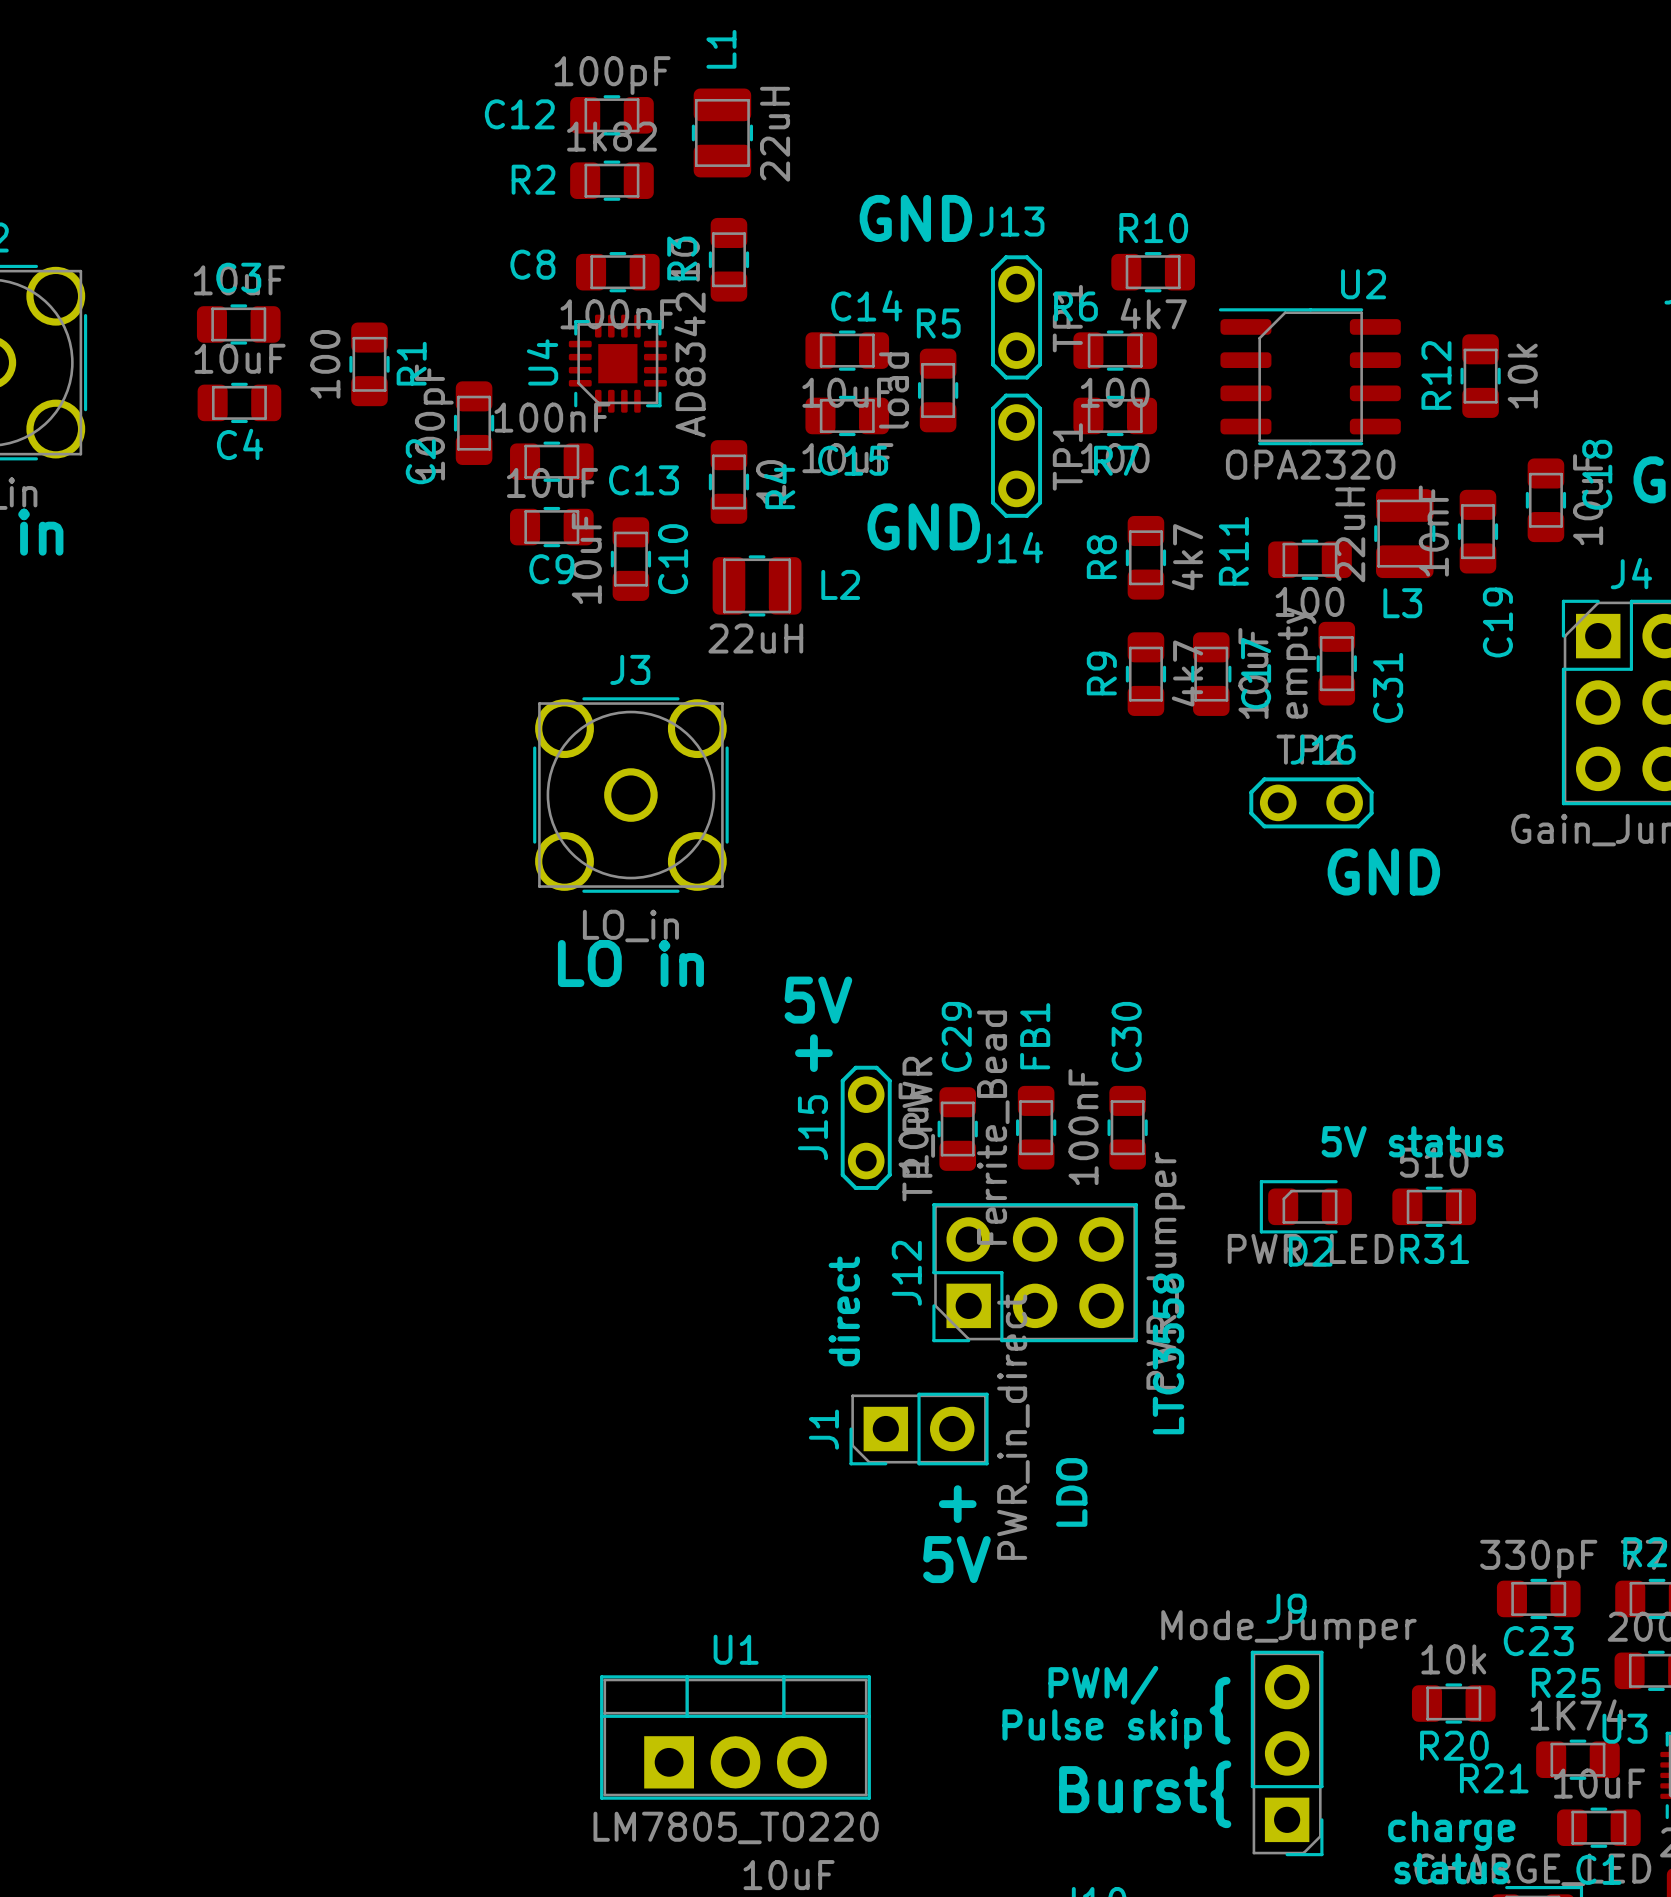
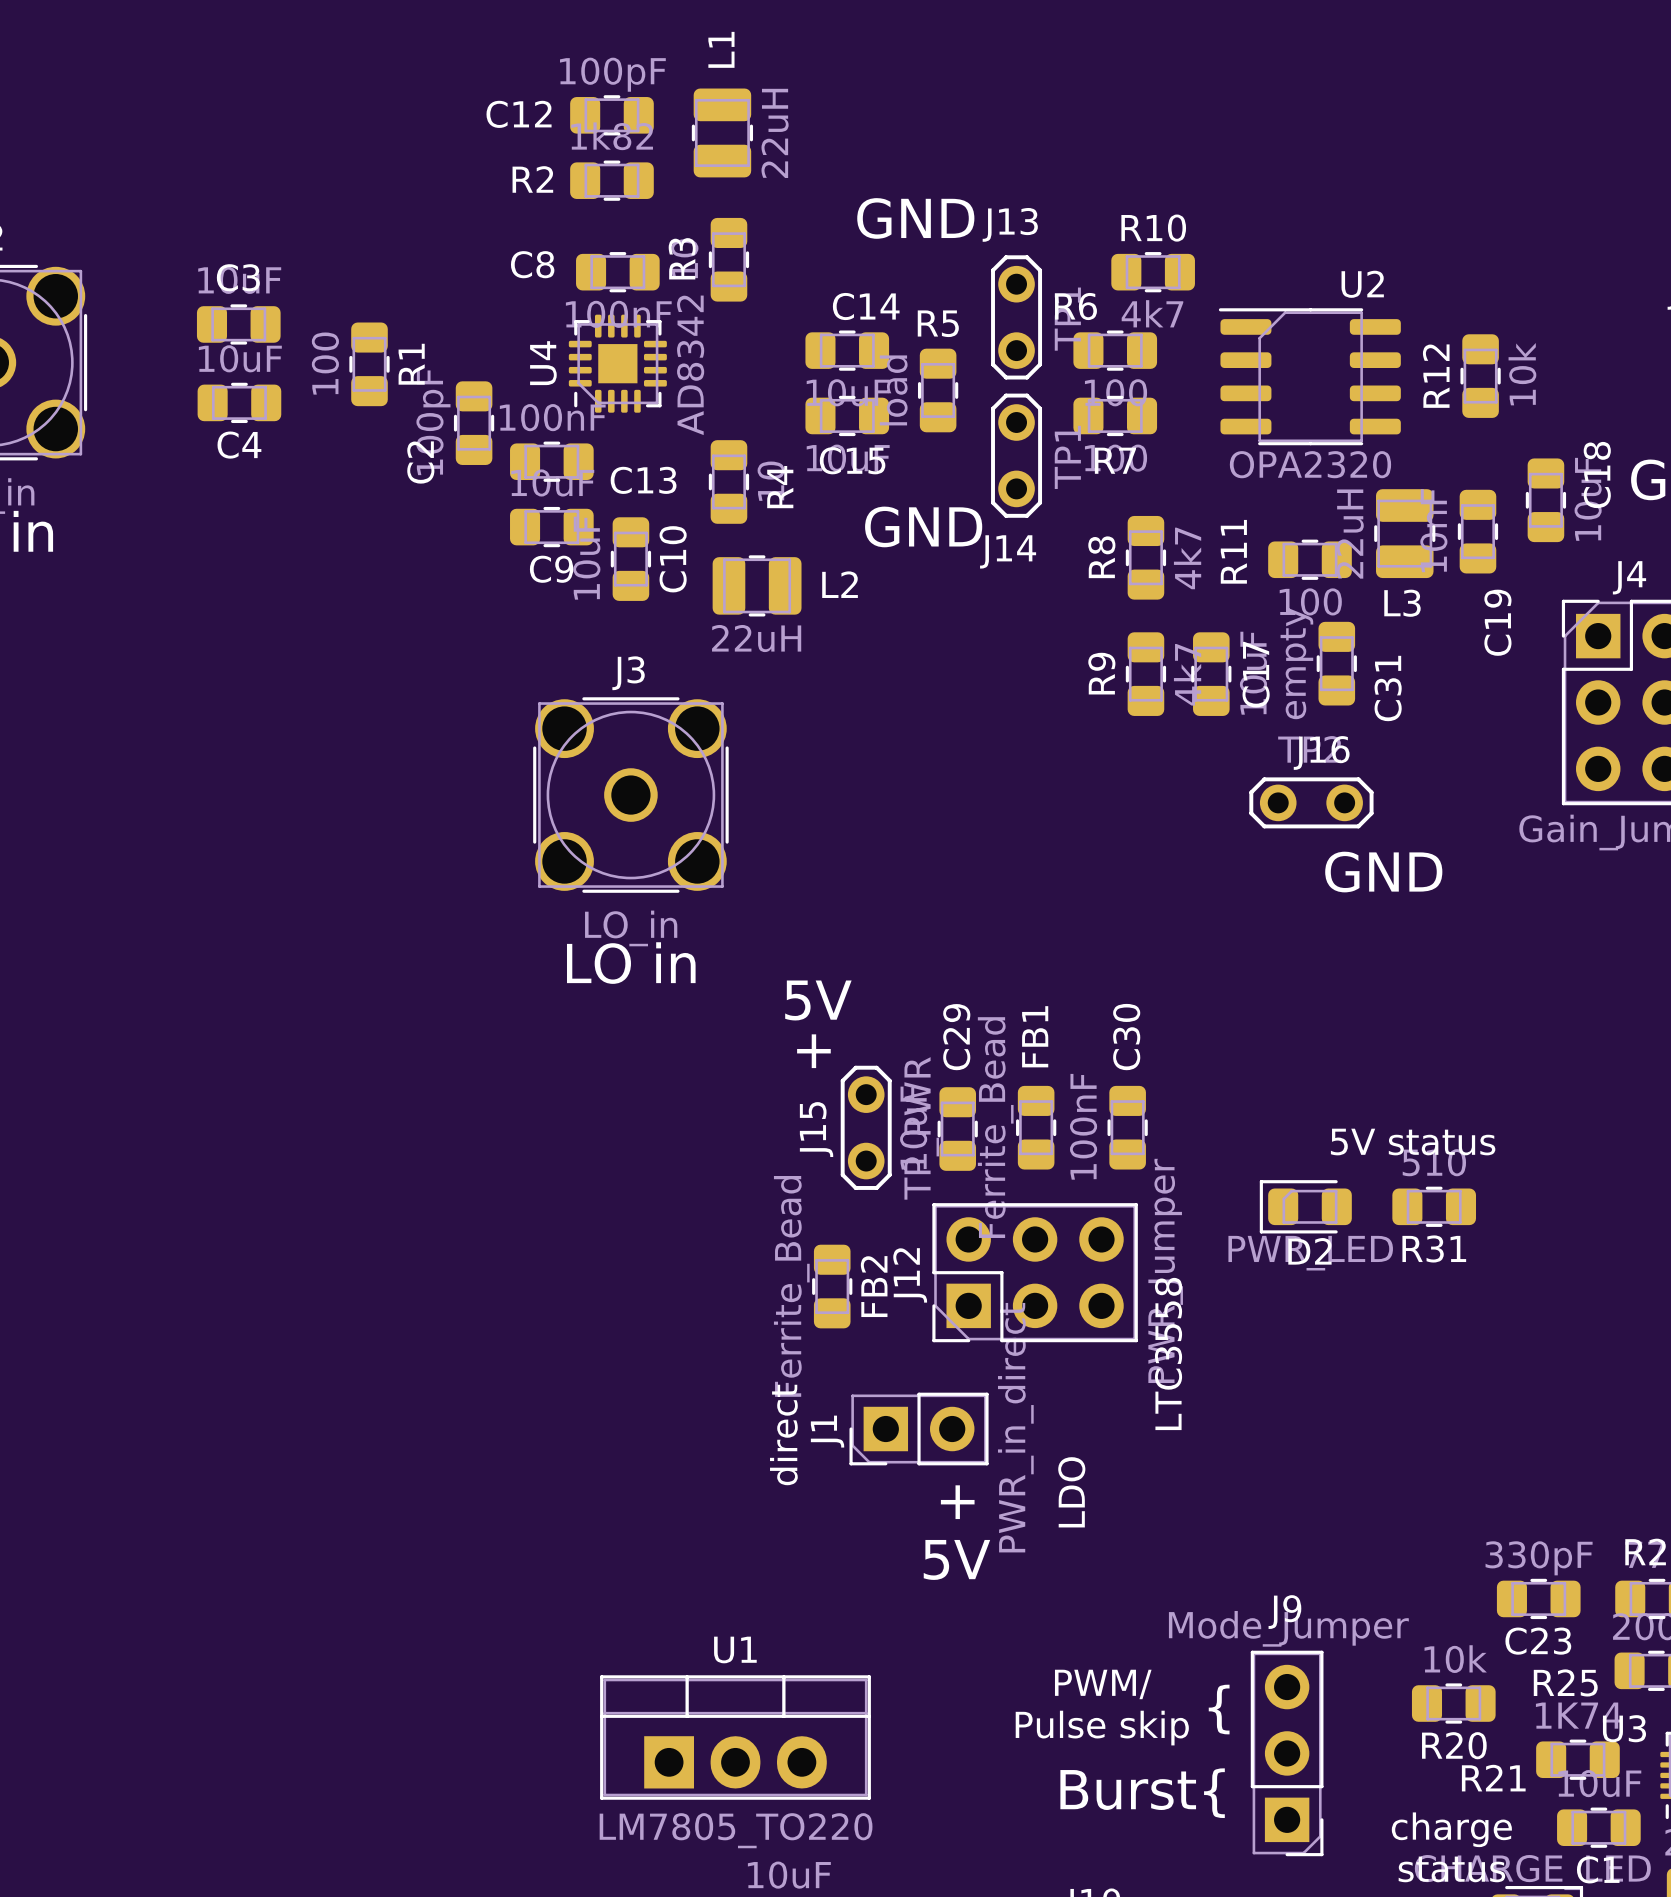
FB2: none -> Ferrite_Bead (832, 1286)
text position: direct (844, 1311) -> direct (783, 1434)

